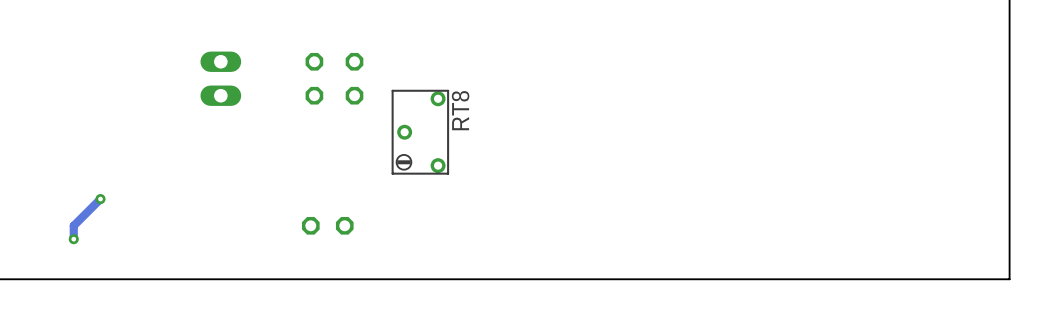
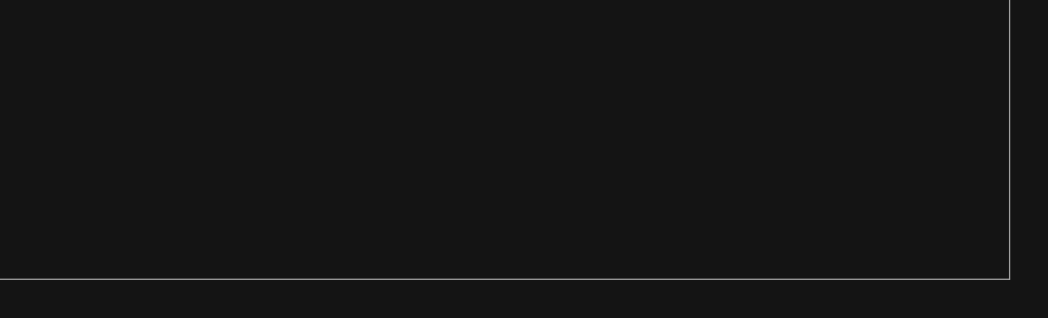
part: (220, 78) -> none
part: (314, 78) -> none
part: (354, 78) -> none
RT8: (420, 132) -> none
track: (100, 199) (73, 225) (73, 239) -> none
via: (100, 199) -> none
part: (327, 225) -> none
via: (73, 239) -> none

